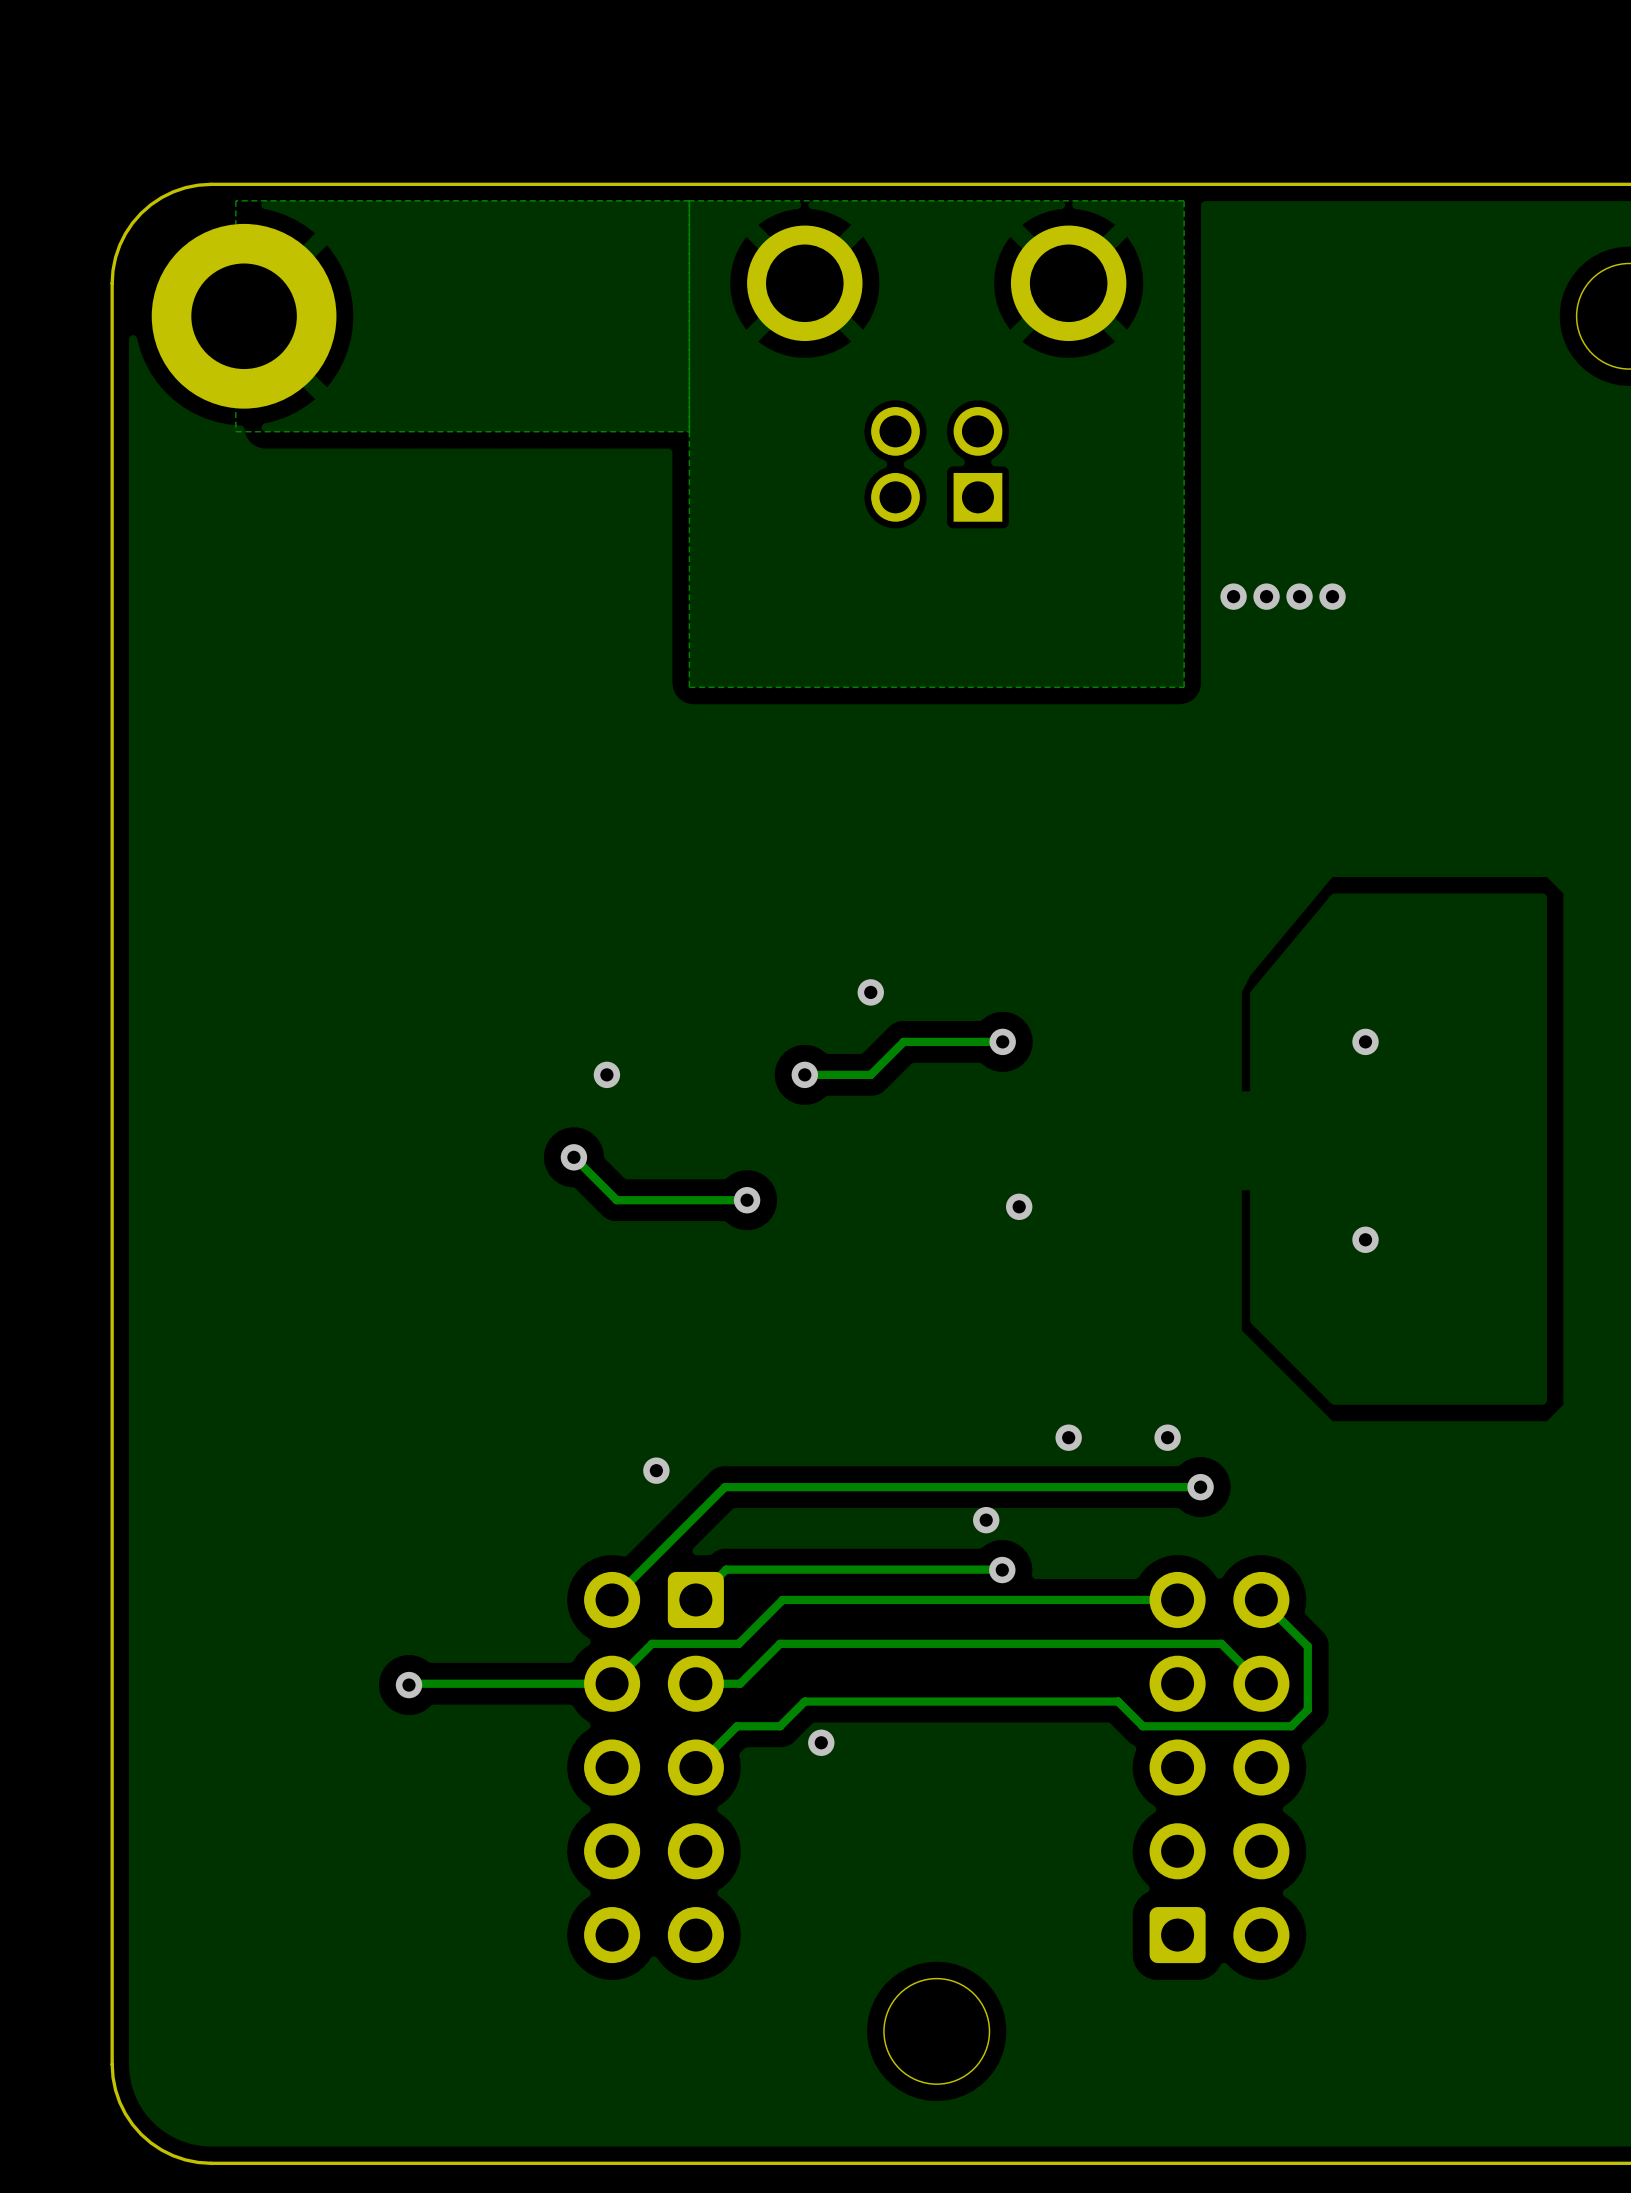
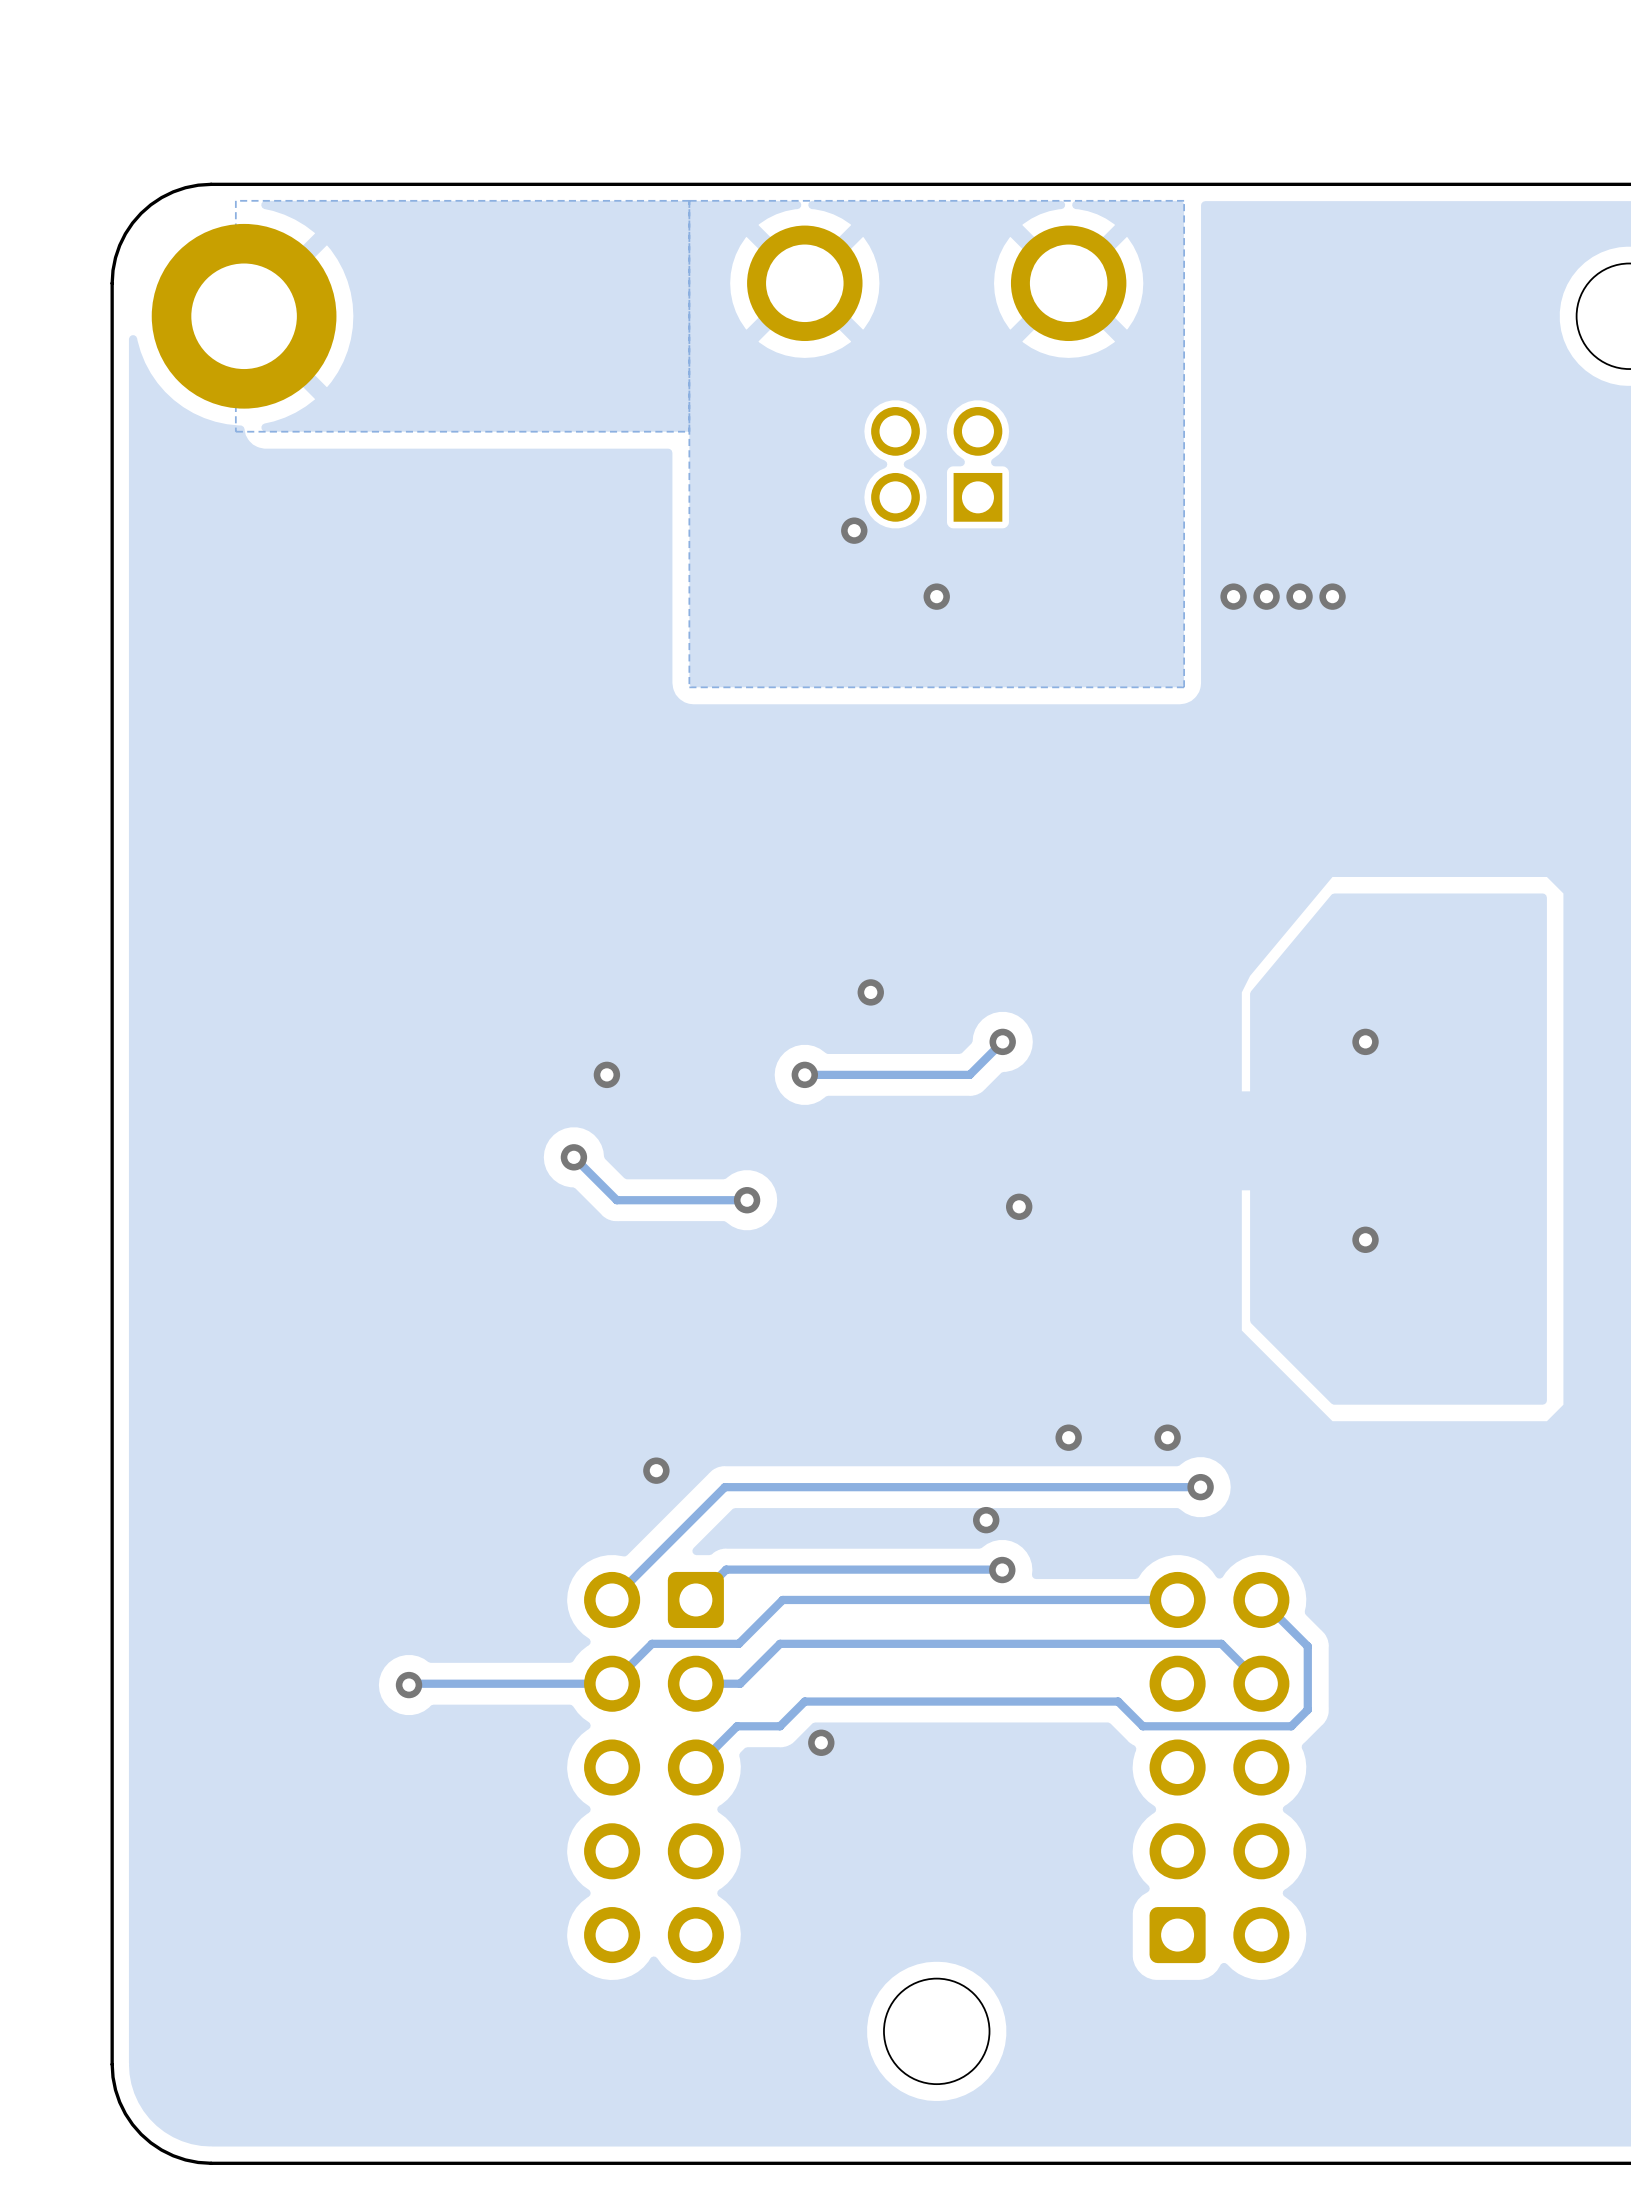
via: none -> (854, 530)
via: none -> (936, 596)
track: (1002, 1041) (903, 1041) (870, 1074) -> (1002, 1041) (969, 1074) (870, 1074)

